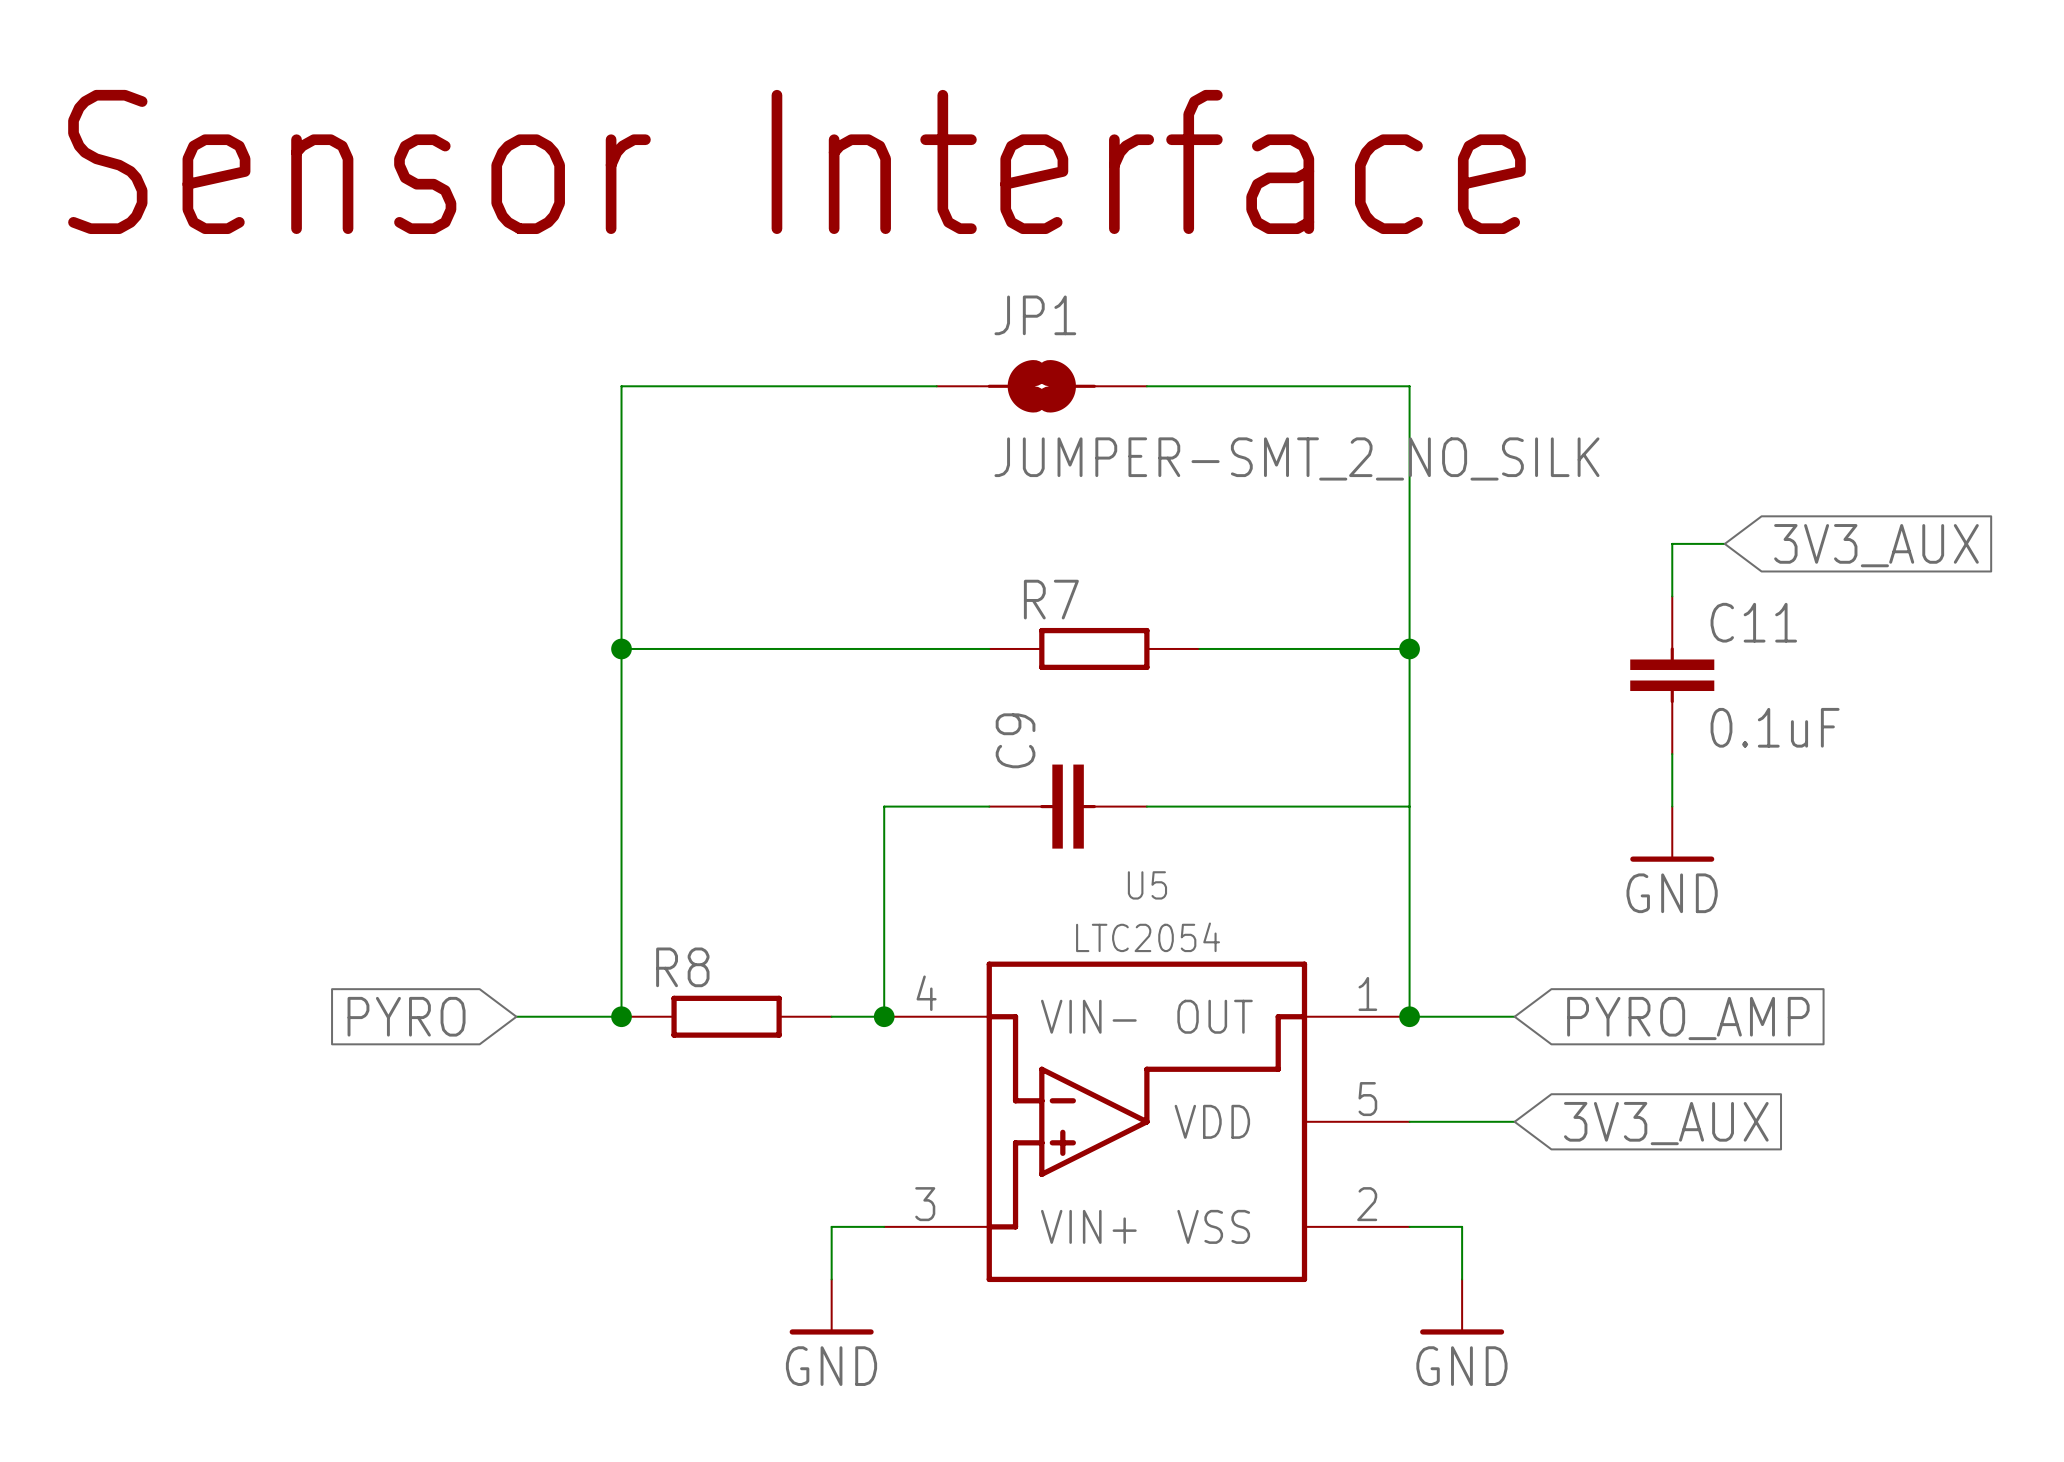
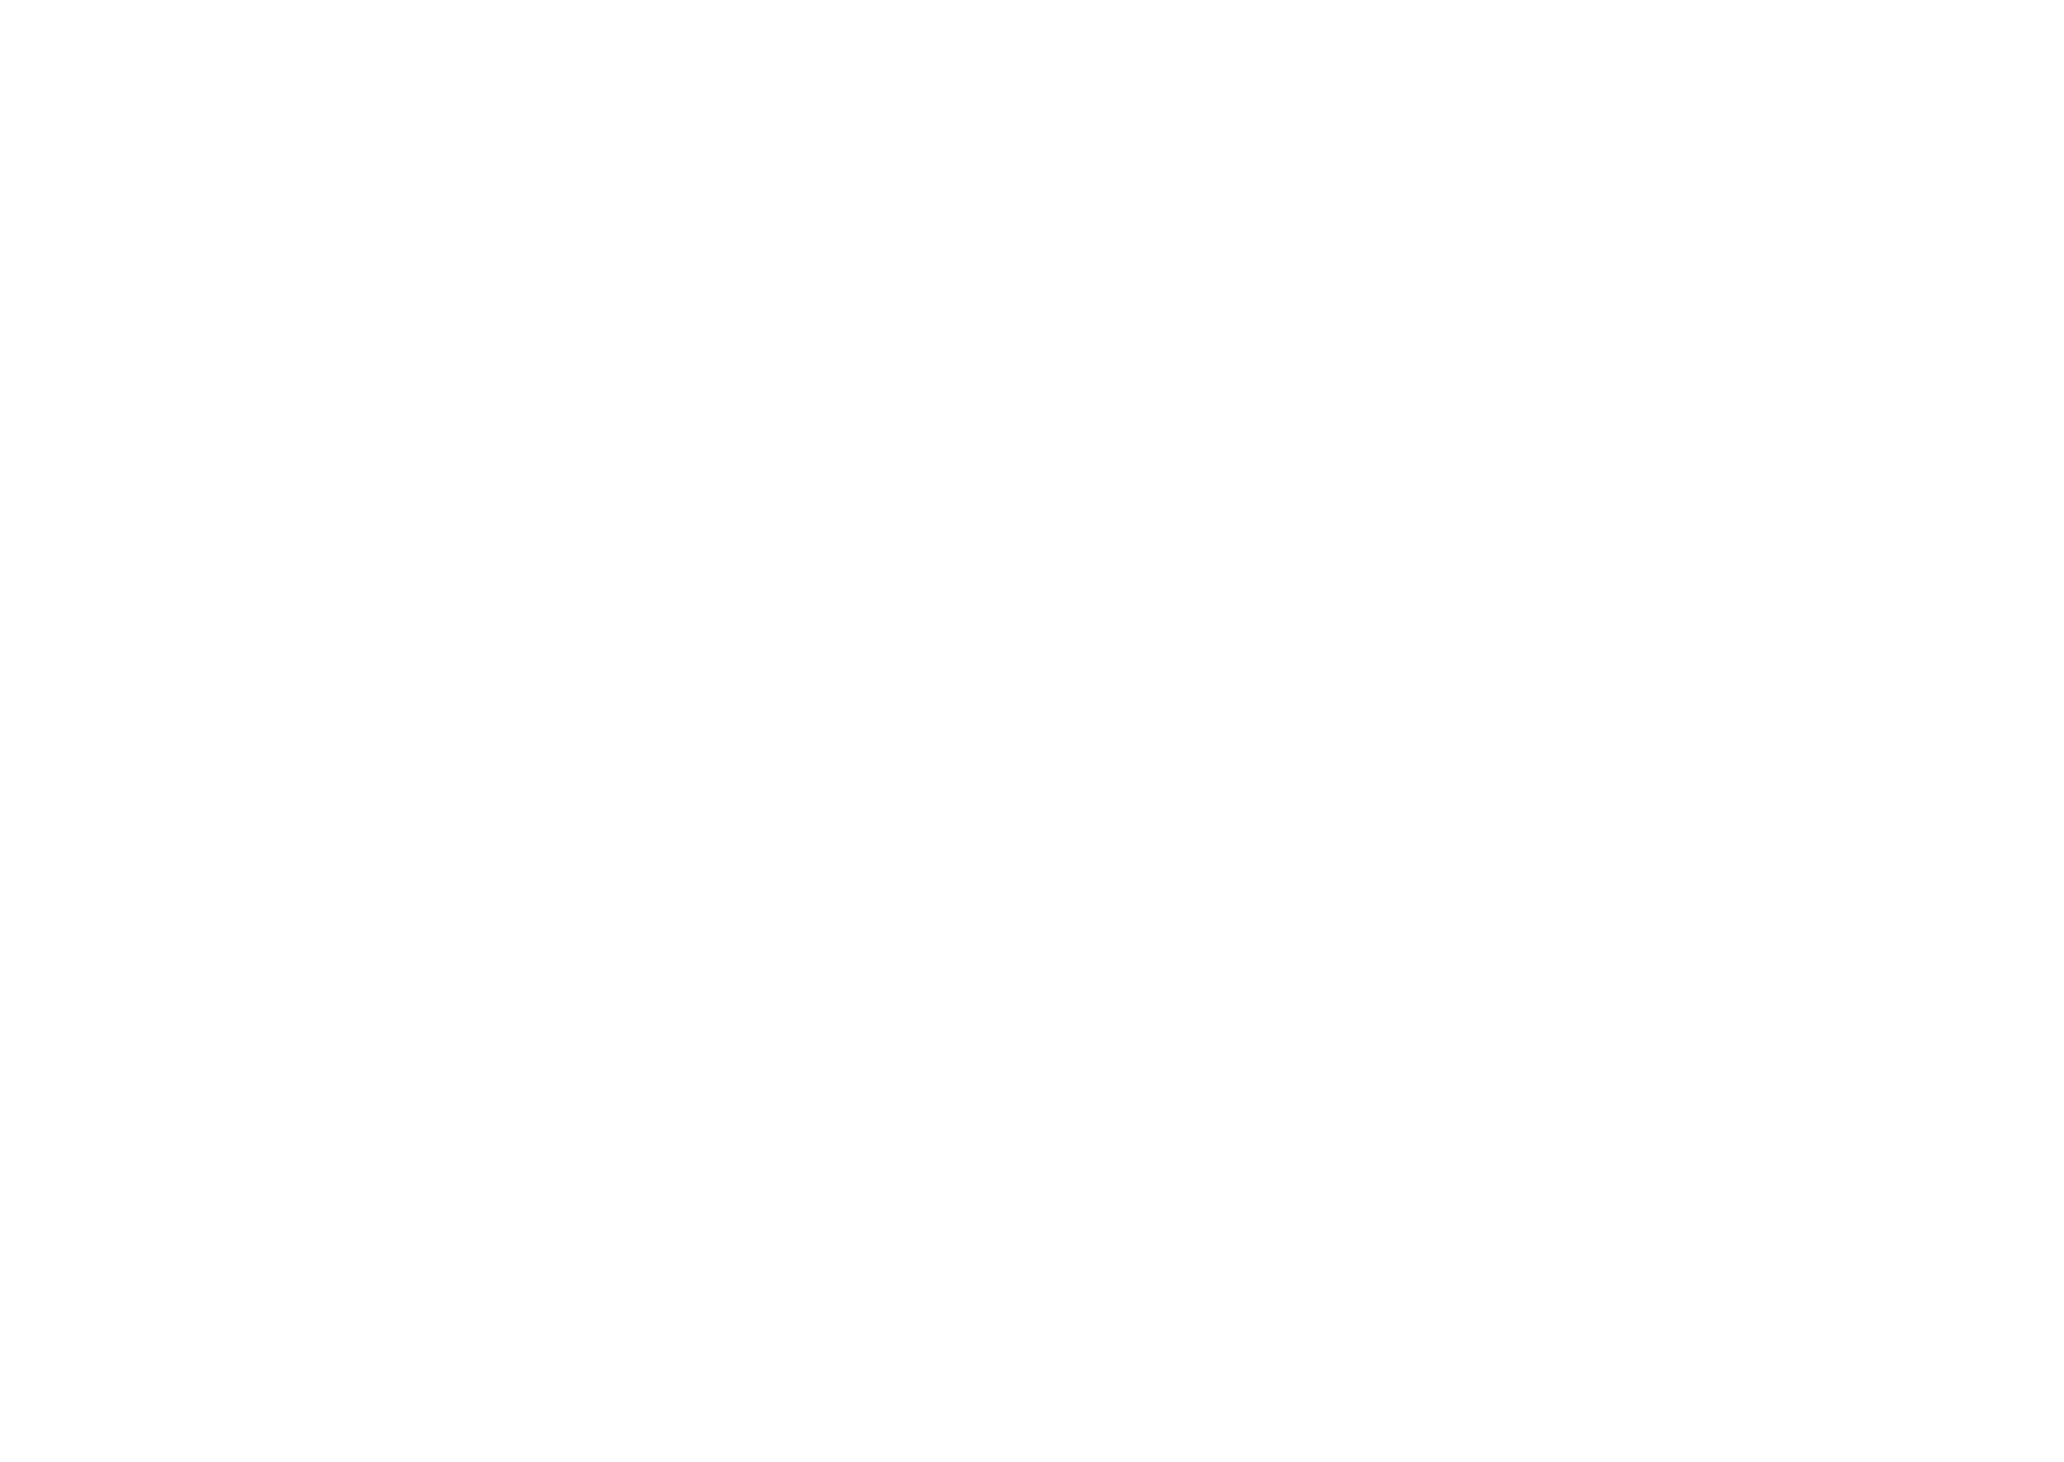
text: Sensor Interface (796, 161) -> none
wire: (936, 386) (621, 386) (621, 1016) (516, 1016) -> none
JP1: JUMPER-SMT_2_NO_SILK (1041, 386) -> none
wire: (1146, 386) (1409, 386) (1409, 1016) (1514, 1016) -> none
wire: (1724, 543) (1672, 543) (1672, 596) -> none
global label: 3V3_AUX (1876, 545) -> none
wire: (621, 648) (989, 648) -> none
junction: (621, 648) -> none
R7: (1094, 648) -> none
wire: (1199, 648) (1409, 648) -> none
junction: (1409, 648) -> none
C11: 0.1uF (1672, 675) -> none
wire: (1672, 754) (1672, 806) -> none
wire: (989, 806) (884, 806) (884, 1016) (831, 1016) -> none
C9: (1068, 806) -> none
wire: (1146, 806) (1409, 806) -> none
power symbol: GND (1672, 834) -> none
global label: PYRO (406, 1016) -> none
junction: (621, 1016) -> none
R8: (726, 1016) -> none
junction: (884, 1016) -> none
junction: (1409, 1016) -> none
global label: PYRO_AMP (1688, 1018) -> none
U5: (1146, 1121) -> none
wire: (1409, 1121) (1514, 1121) -> none
global label: 3V3_AUX (1666, 1123) -> none
wire: (884, 1226) (831, 1226) (831, 1279) -> none
wire: (1409, 1226) (1462, 1226) (1462, 1279) -> none
power symbol: GND (831, 1307) -> none
power symbol: GND (1462, 1307) -> none

